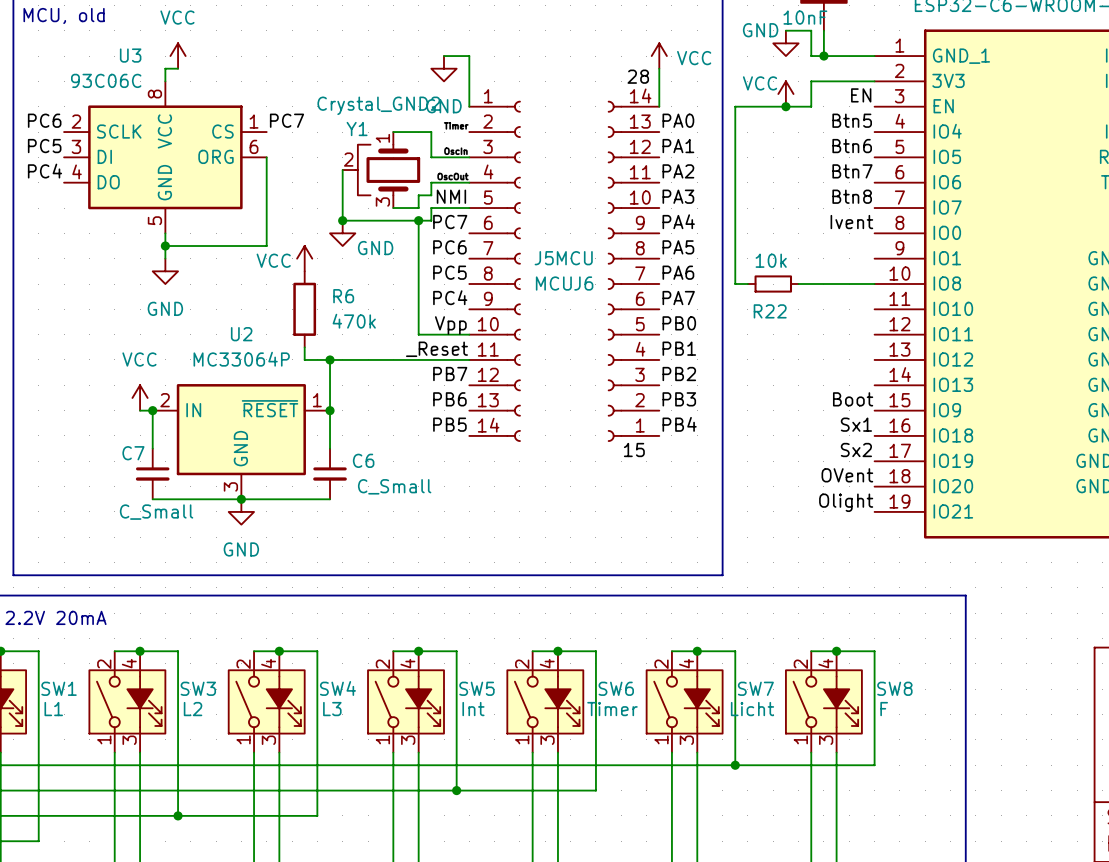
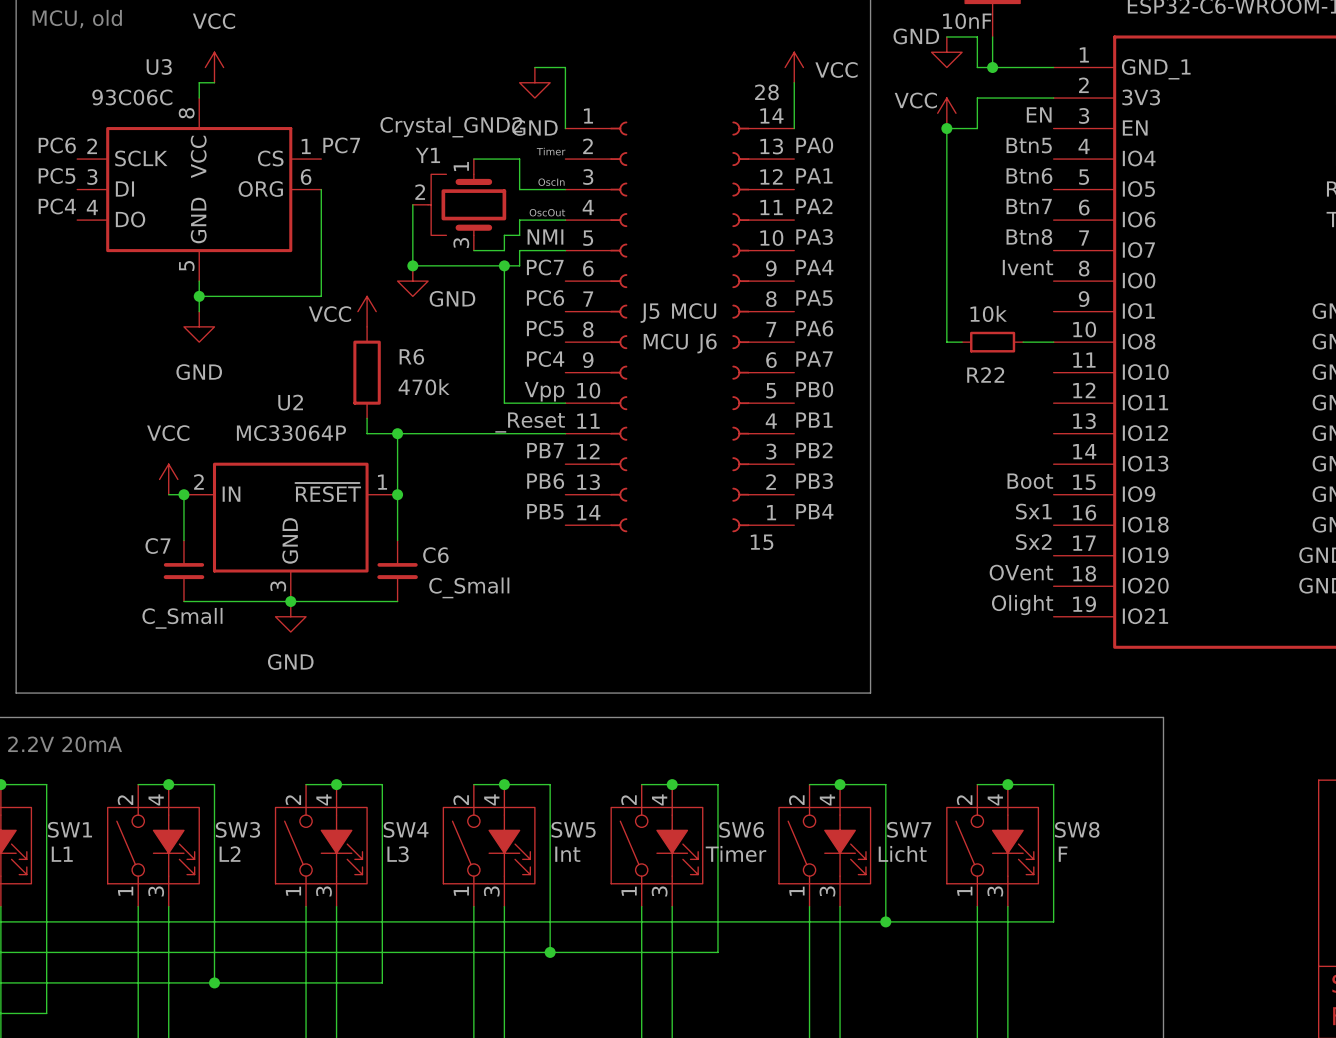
wire: (785, 106) (735, 106) (735, 284) (747, 284) -> (946, 128) (946, 342) (962, 342)
R22 position: (773, 284) -> (992, 342)
wire: (798, 284) (849, 284) -> none

